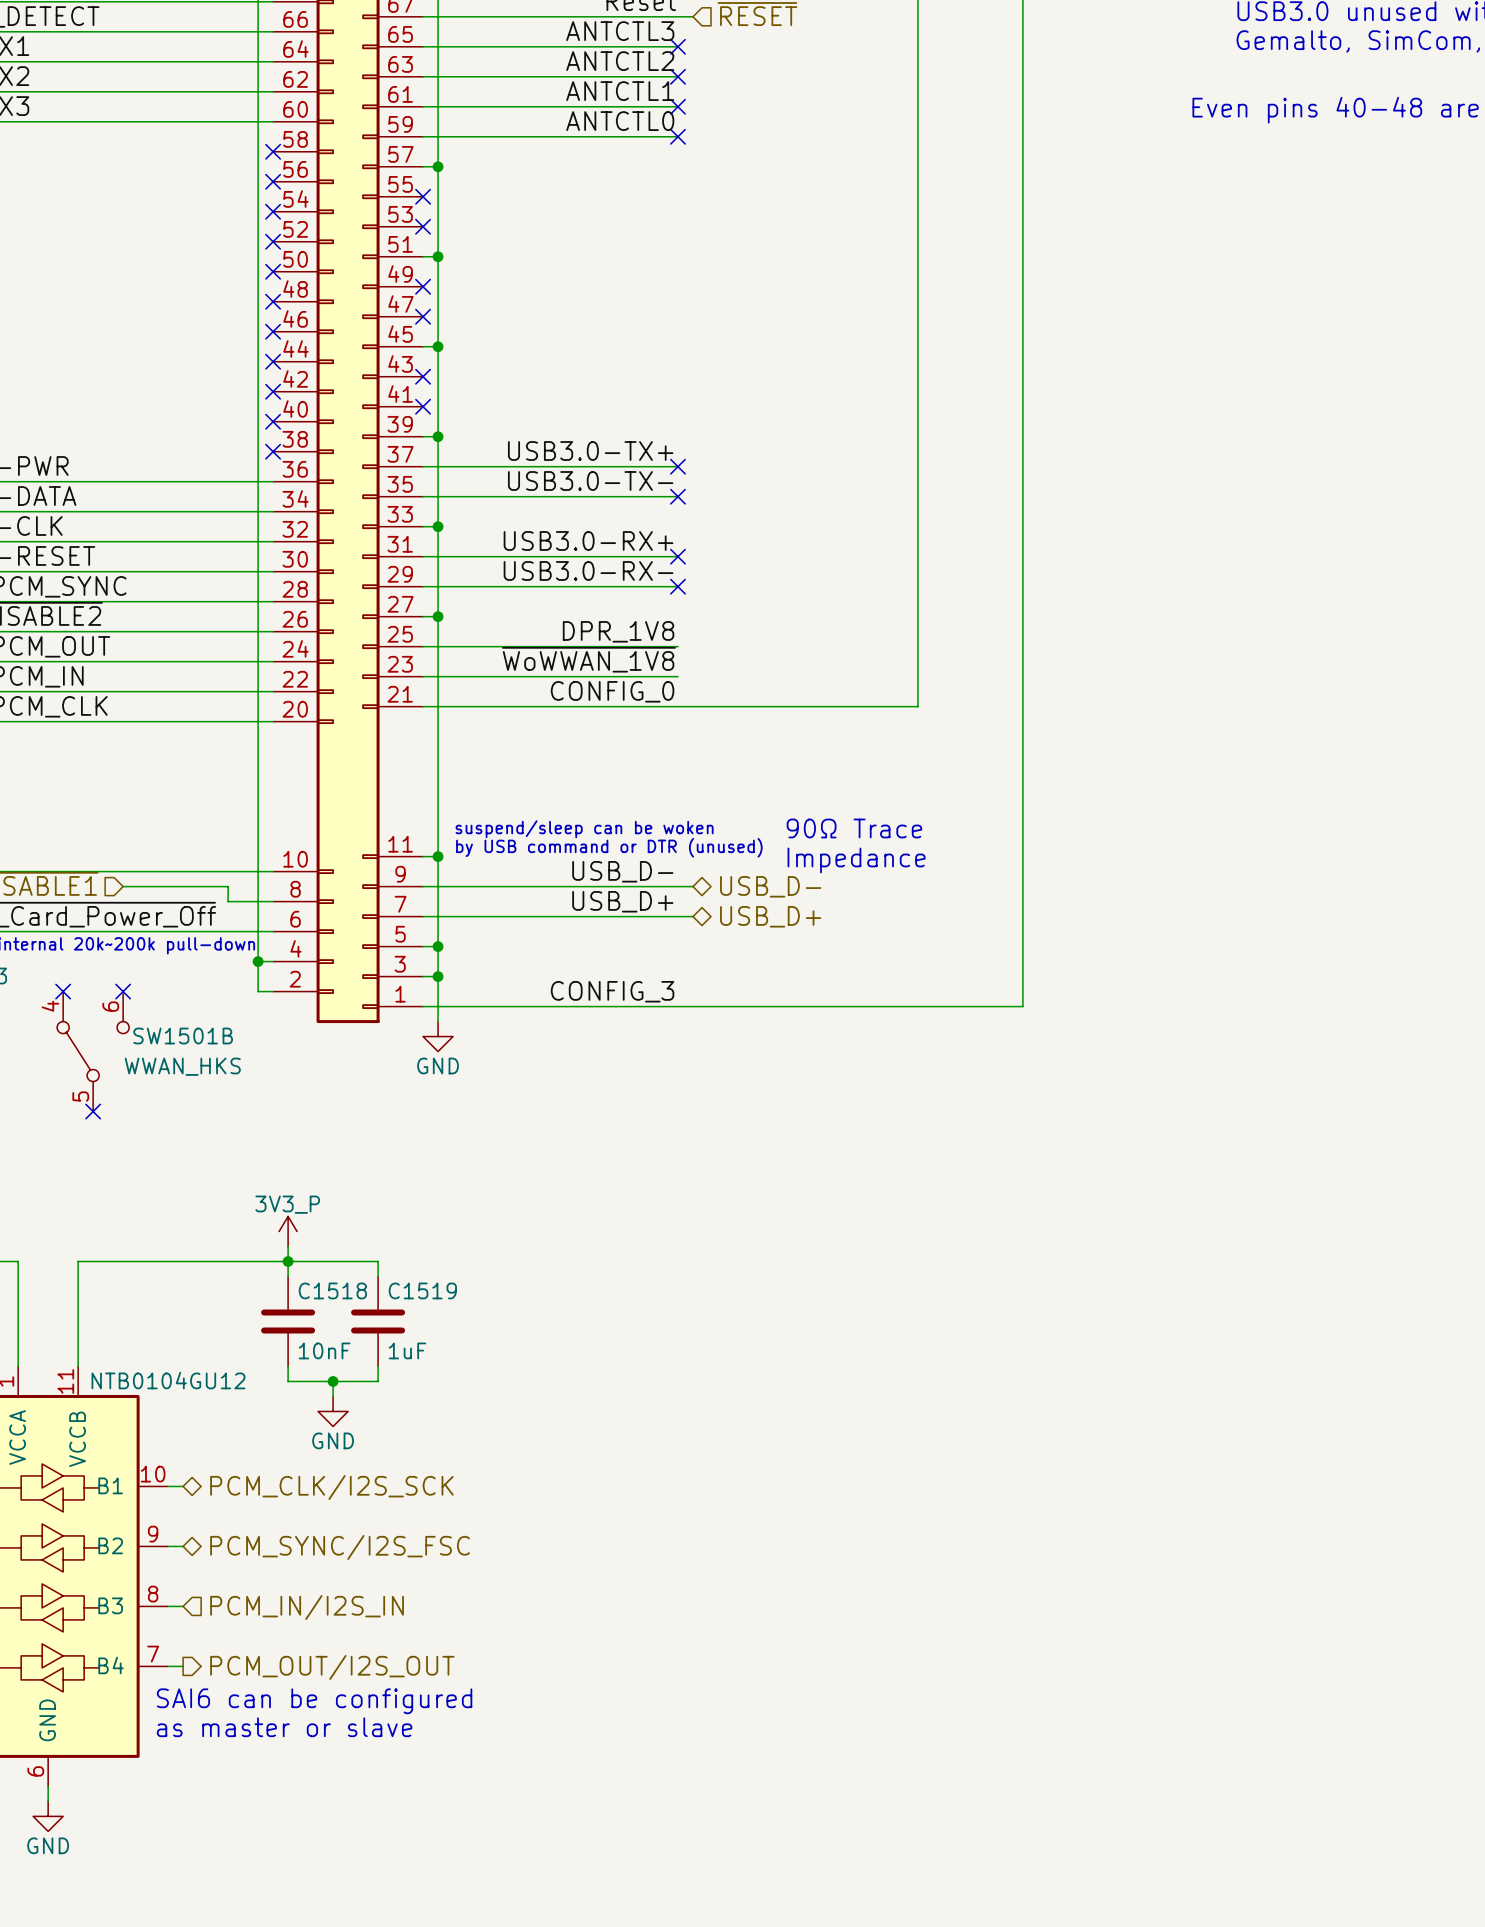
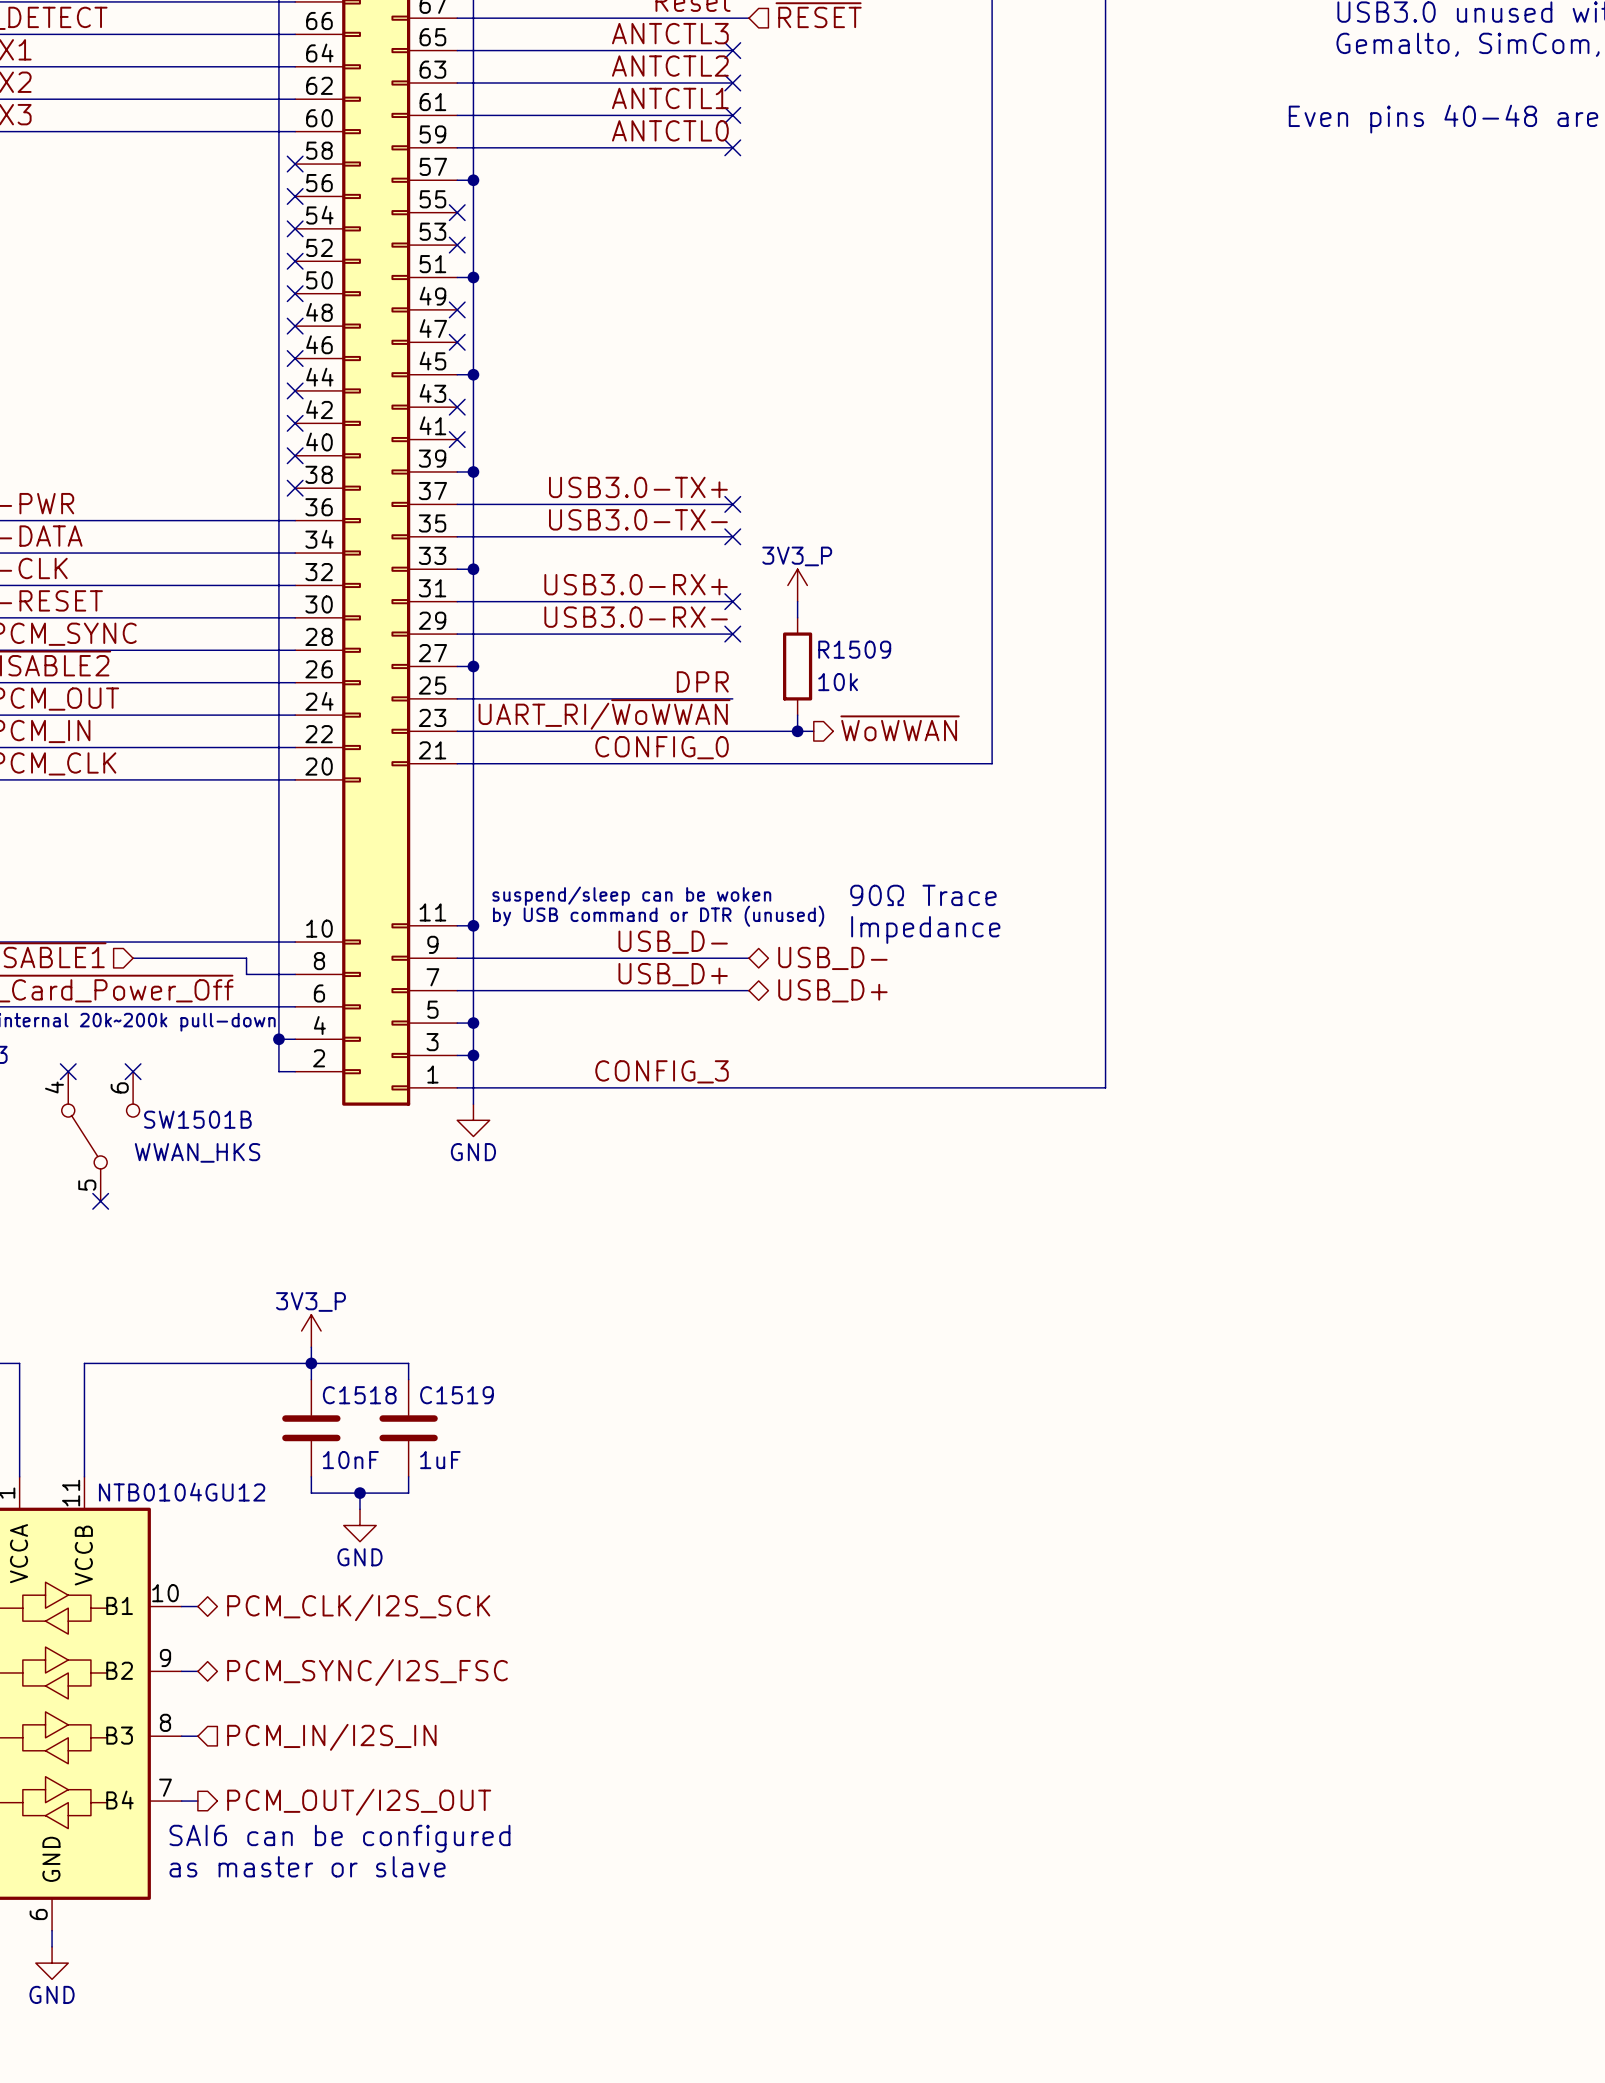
power symbol: none -> 3V3_P (797, 585)
wire: none -> (797, 601) (797, 617)
R1509: none -> 10k (797, 666)
label: DPR_1V8 (618, 631) -> DPR (702, 681)
label: ~{WoWWAN_1V8} (588, 659) -> UART_RI/~{WoWWAN} (604, 714)
wire: none -> (797, 715) (797, 731)
hierarchical label: none -> ~{WoWWAN} (900, 728)
wire: none -> (732, 731) (813, 731)
junction: none -> (797, 731)

